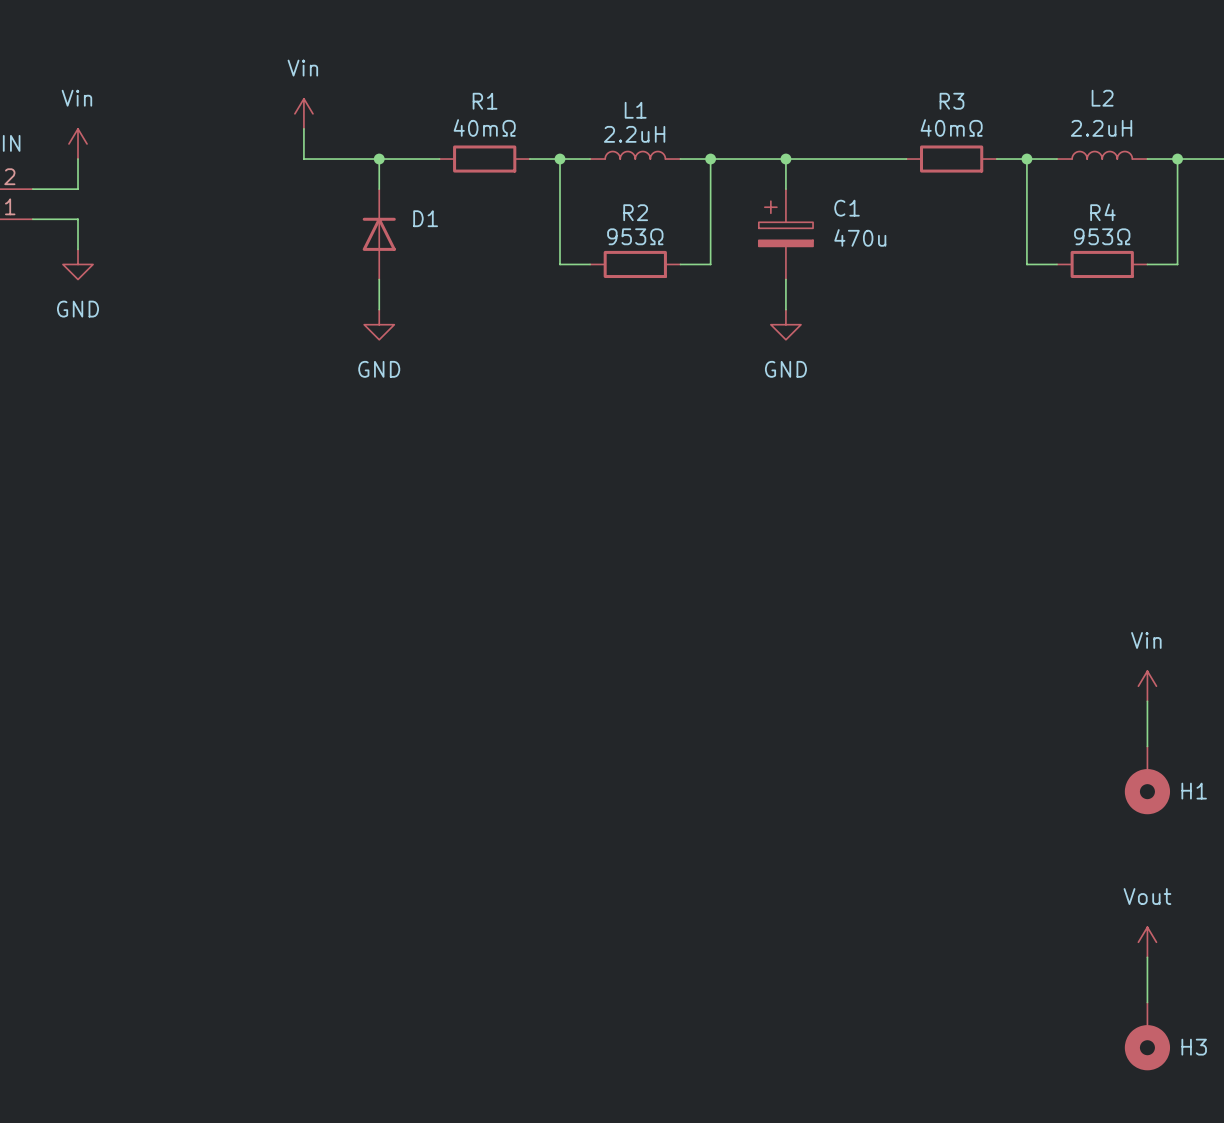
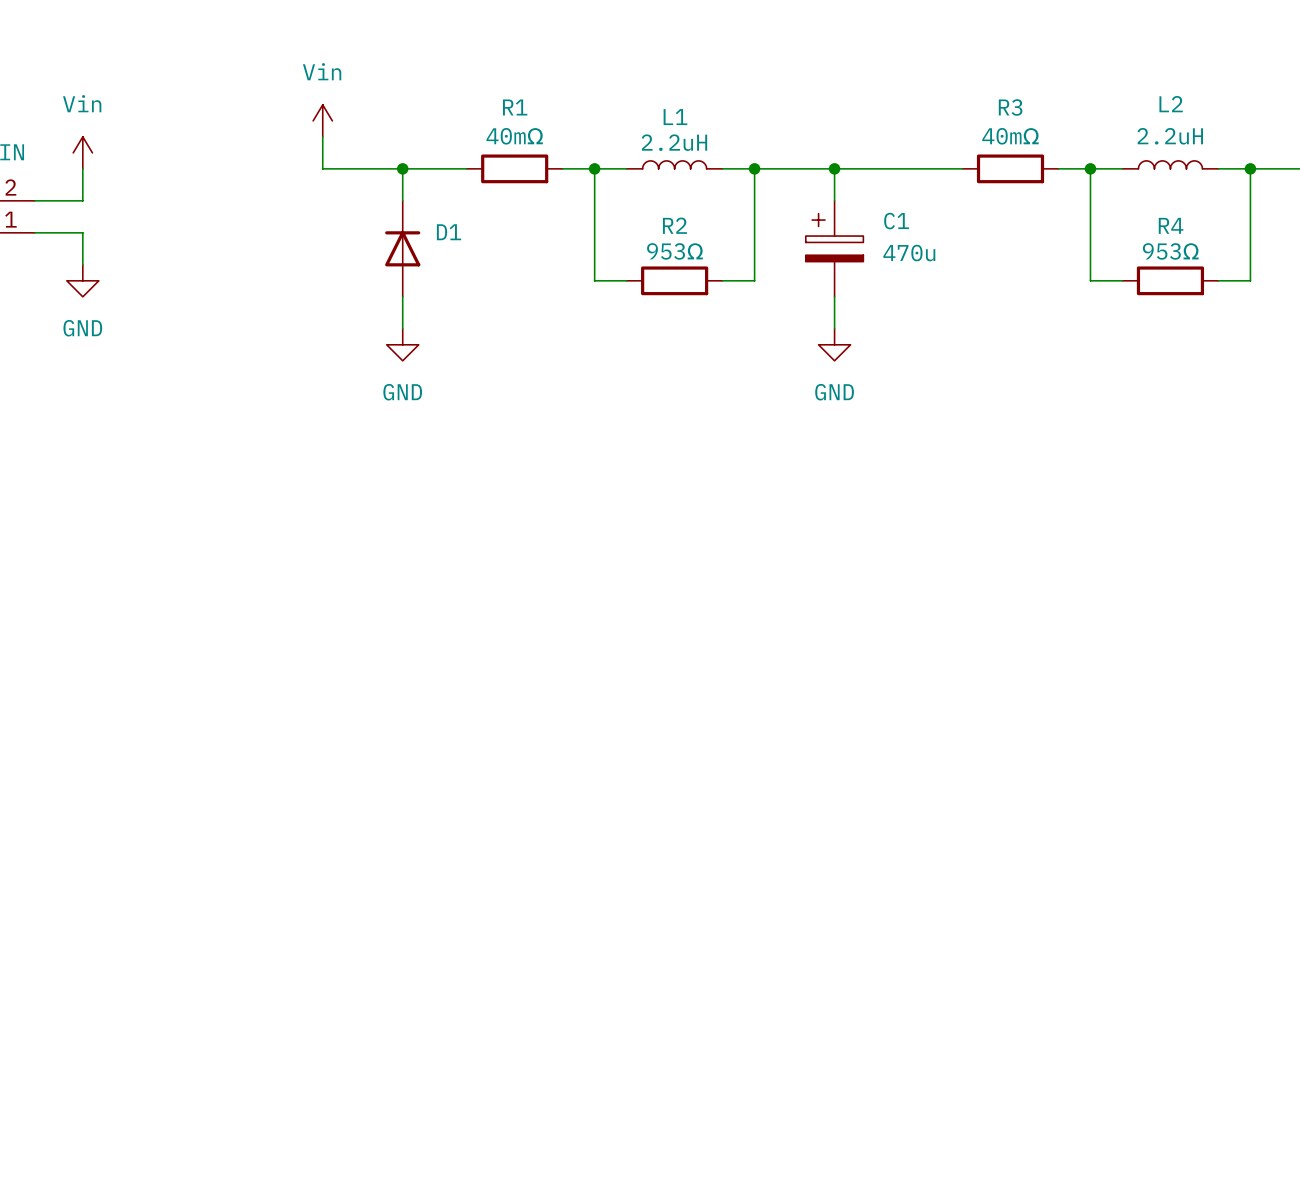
power symbol: Vin (1147, 686) -> none
wire: (1147, 701) (1147, 746) -> none
H1: (1147, 780) -> none
power symbol: Vout (1147, 942) -> none
wire: (1147, 957) (1147, 1002) -> none
H3: (1147, 1036) -> none

